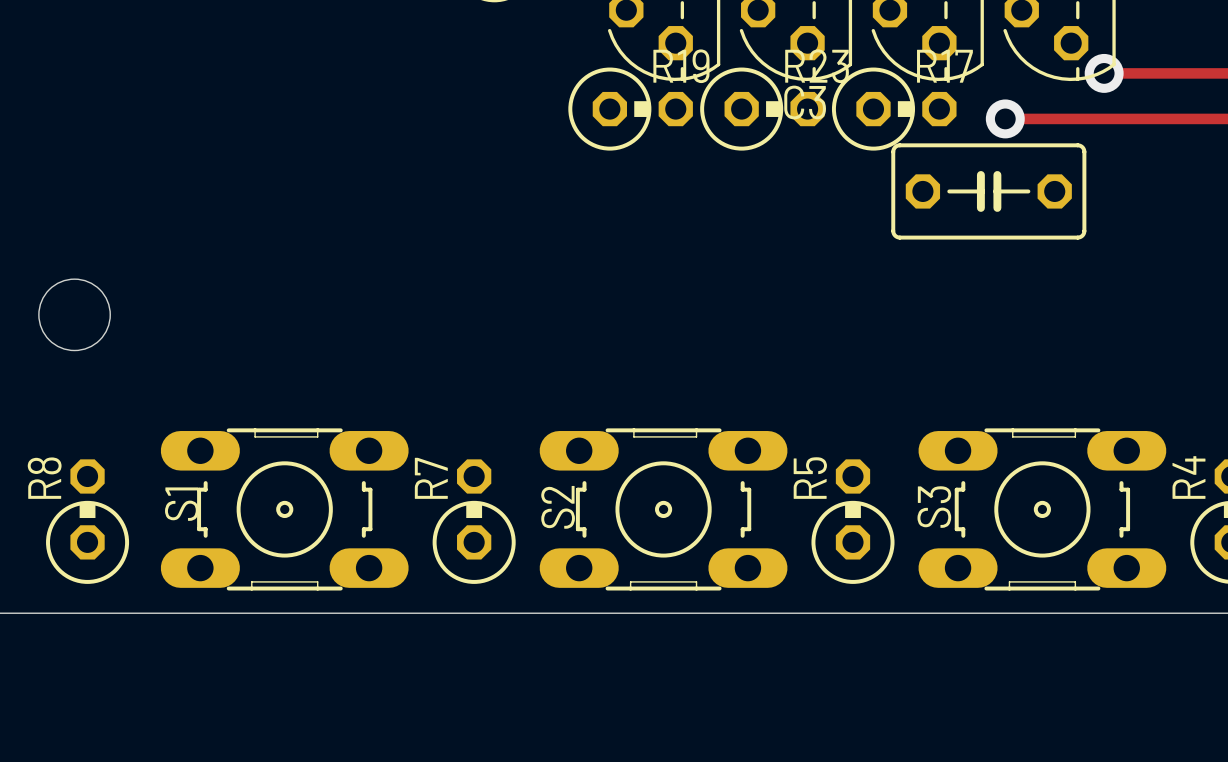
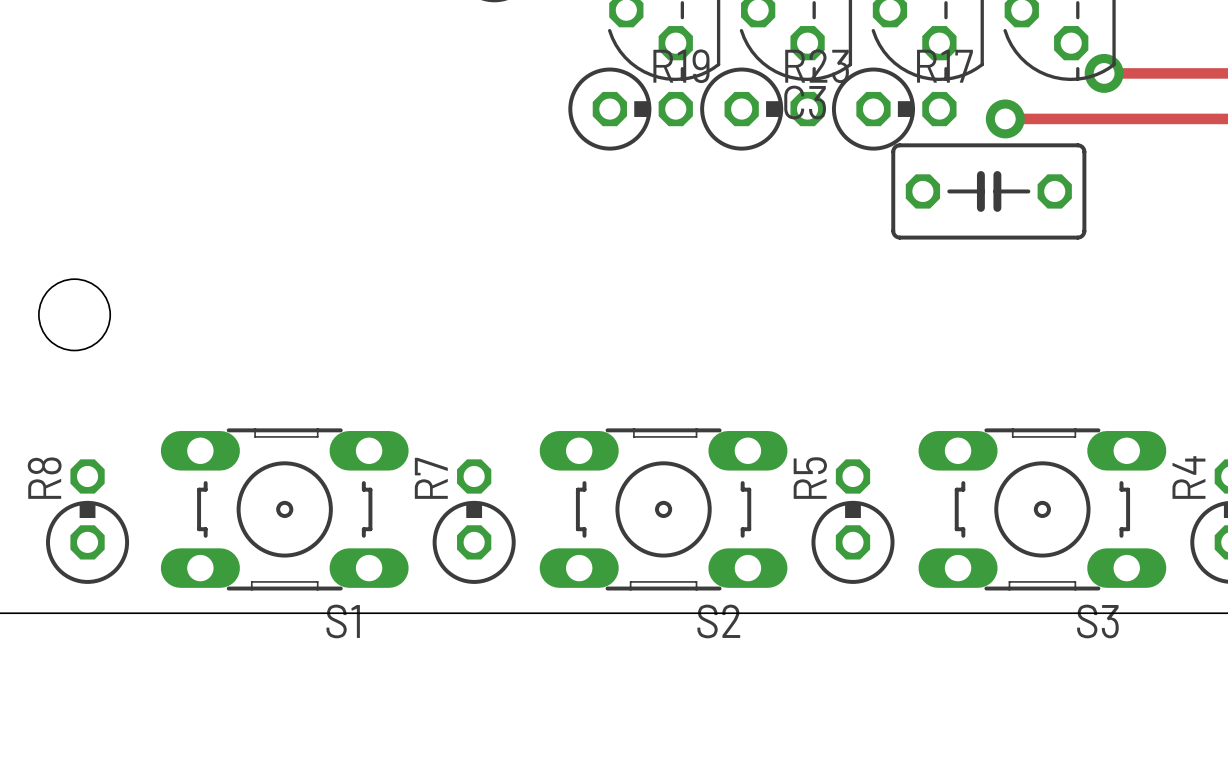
S1 name rotation: 0° (181, 504) -> 90° clockwise (343, 621)
S1 name position: S1 (181, 504) -> S1 (343, 621)
S2 name rotation: 0° (558, 507) -> 90° clockwise (718, 621)
S2 name position: S2 (558, 507) -> S2 (718, 621)
S3 name rotation: 0° (934, 507) -> 90° clockwise (1097, 621)
S3 name position: S3 (934, 507) -> S3 (1097, 621)

